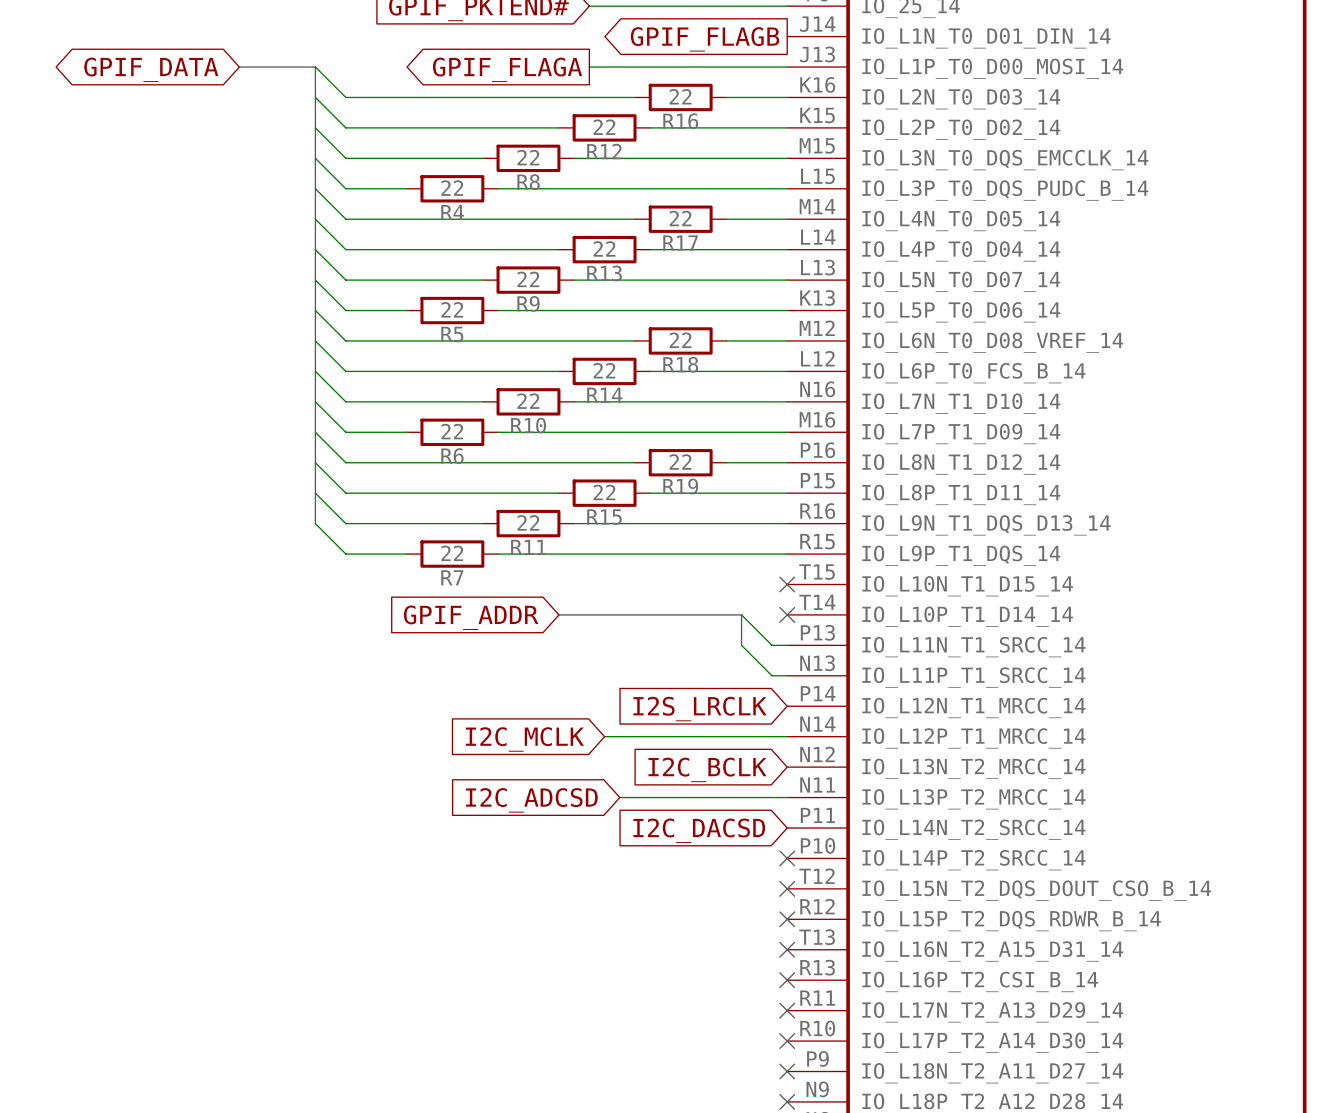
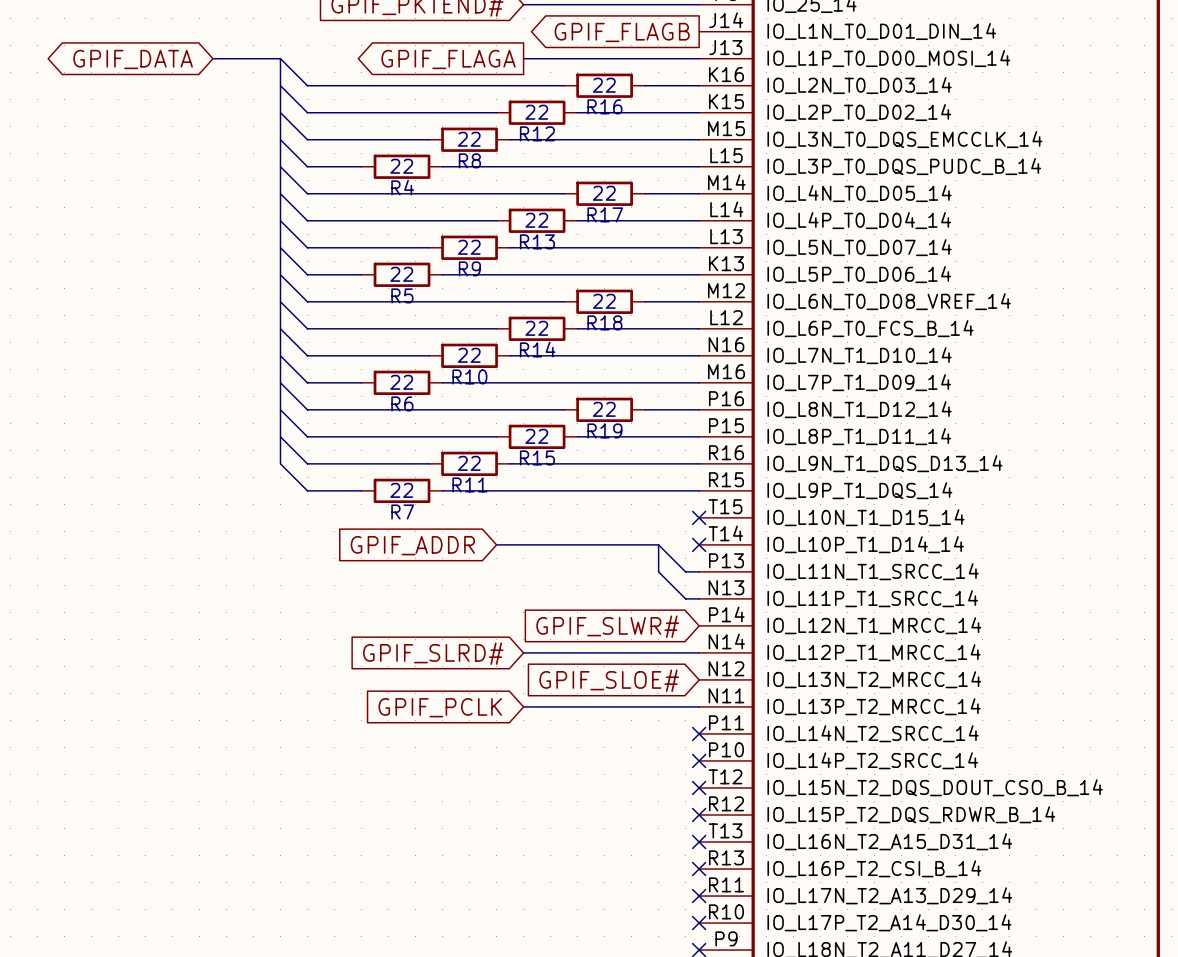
global label: I2S_LRCLK (699, 709) -> GPIF_SLWR# (607, 626)
wire: none -> (523, 652) (537, 652)
global label: none -> GPIF_SLRD# (433, 653)
global label: I2C_MCLK (524, 739) -> none
global label: I2C_BCLK (707, 769) -> GPIF_SLOE# (609, 680)
wire: none -> (523, 706) (550, 706)
global label: none -> GPIF_PCLK (440, 707)
global label: I2C_ADCSD (531, 800) -> none
no-connect mark: none -> (699, 733)
global label: I2C_DACSD (699, 830) -> none

